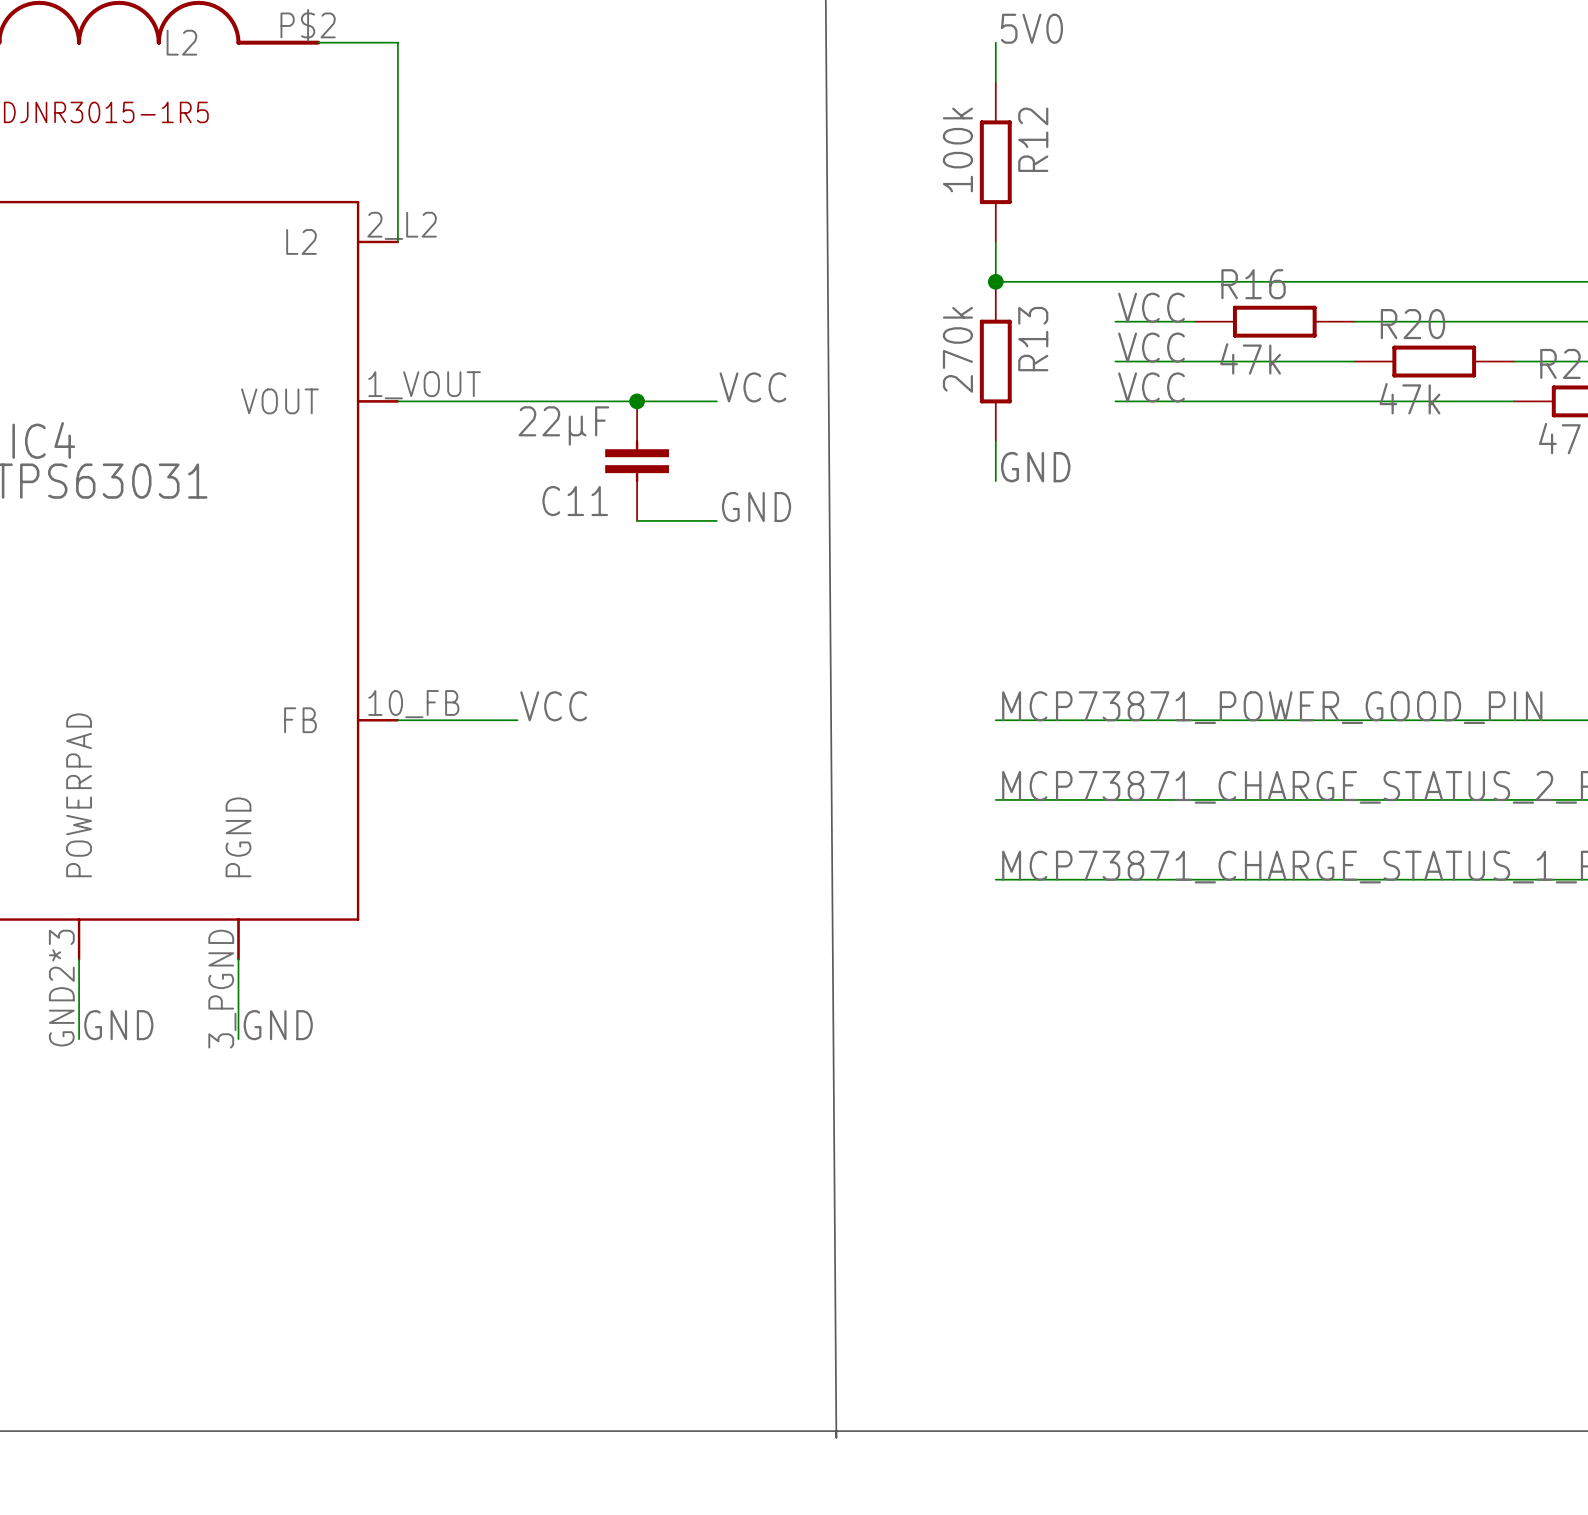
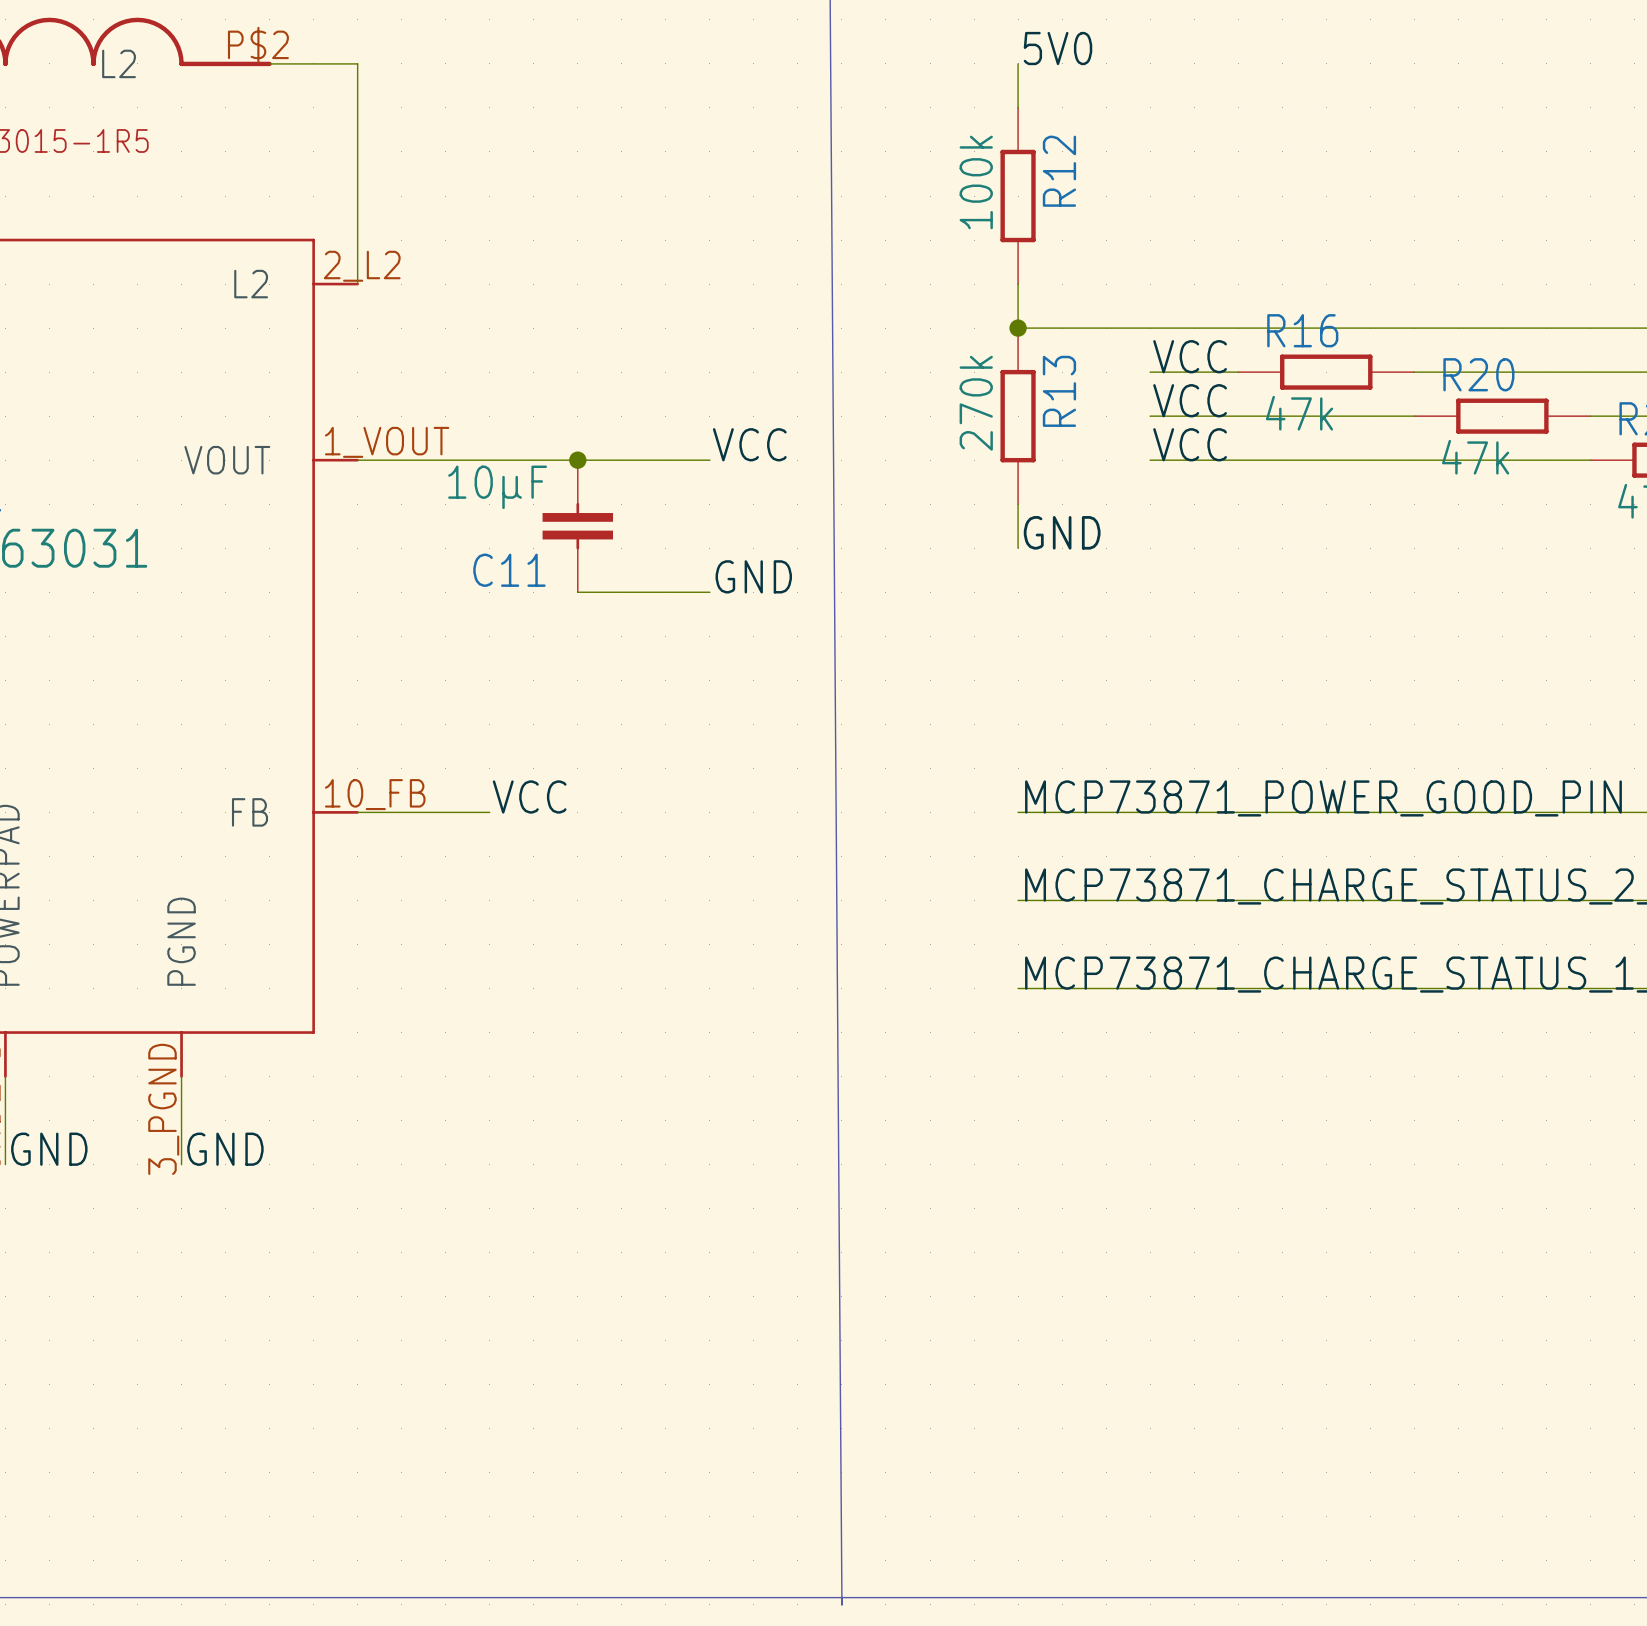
junction position: (637, 401) -> (577, 460)
C11 value: 22µF (563, 425) -> 10µF (497, 487)
C11 position: (637, 461) -> (577, 526)
wire: none -> (577, 592) (621, 592)

